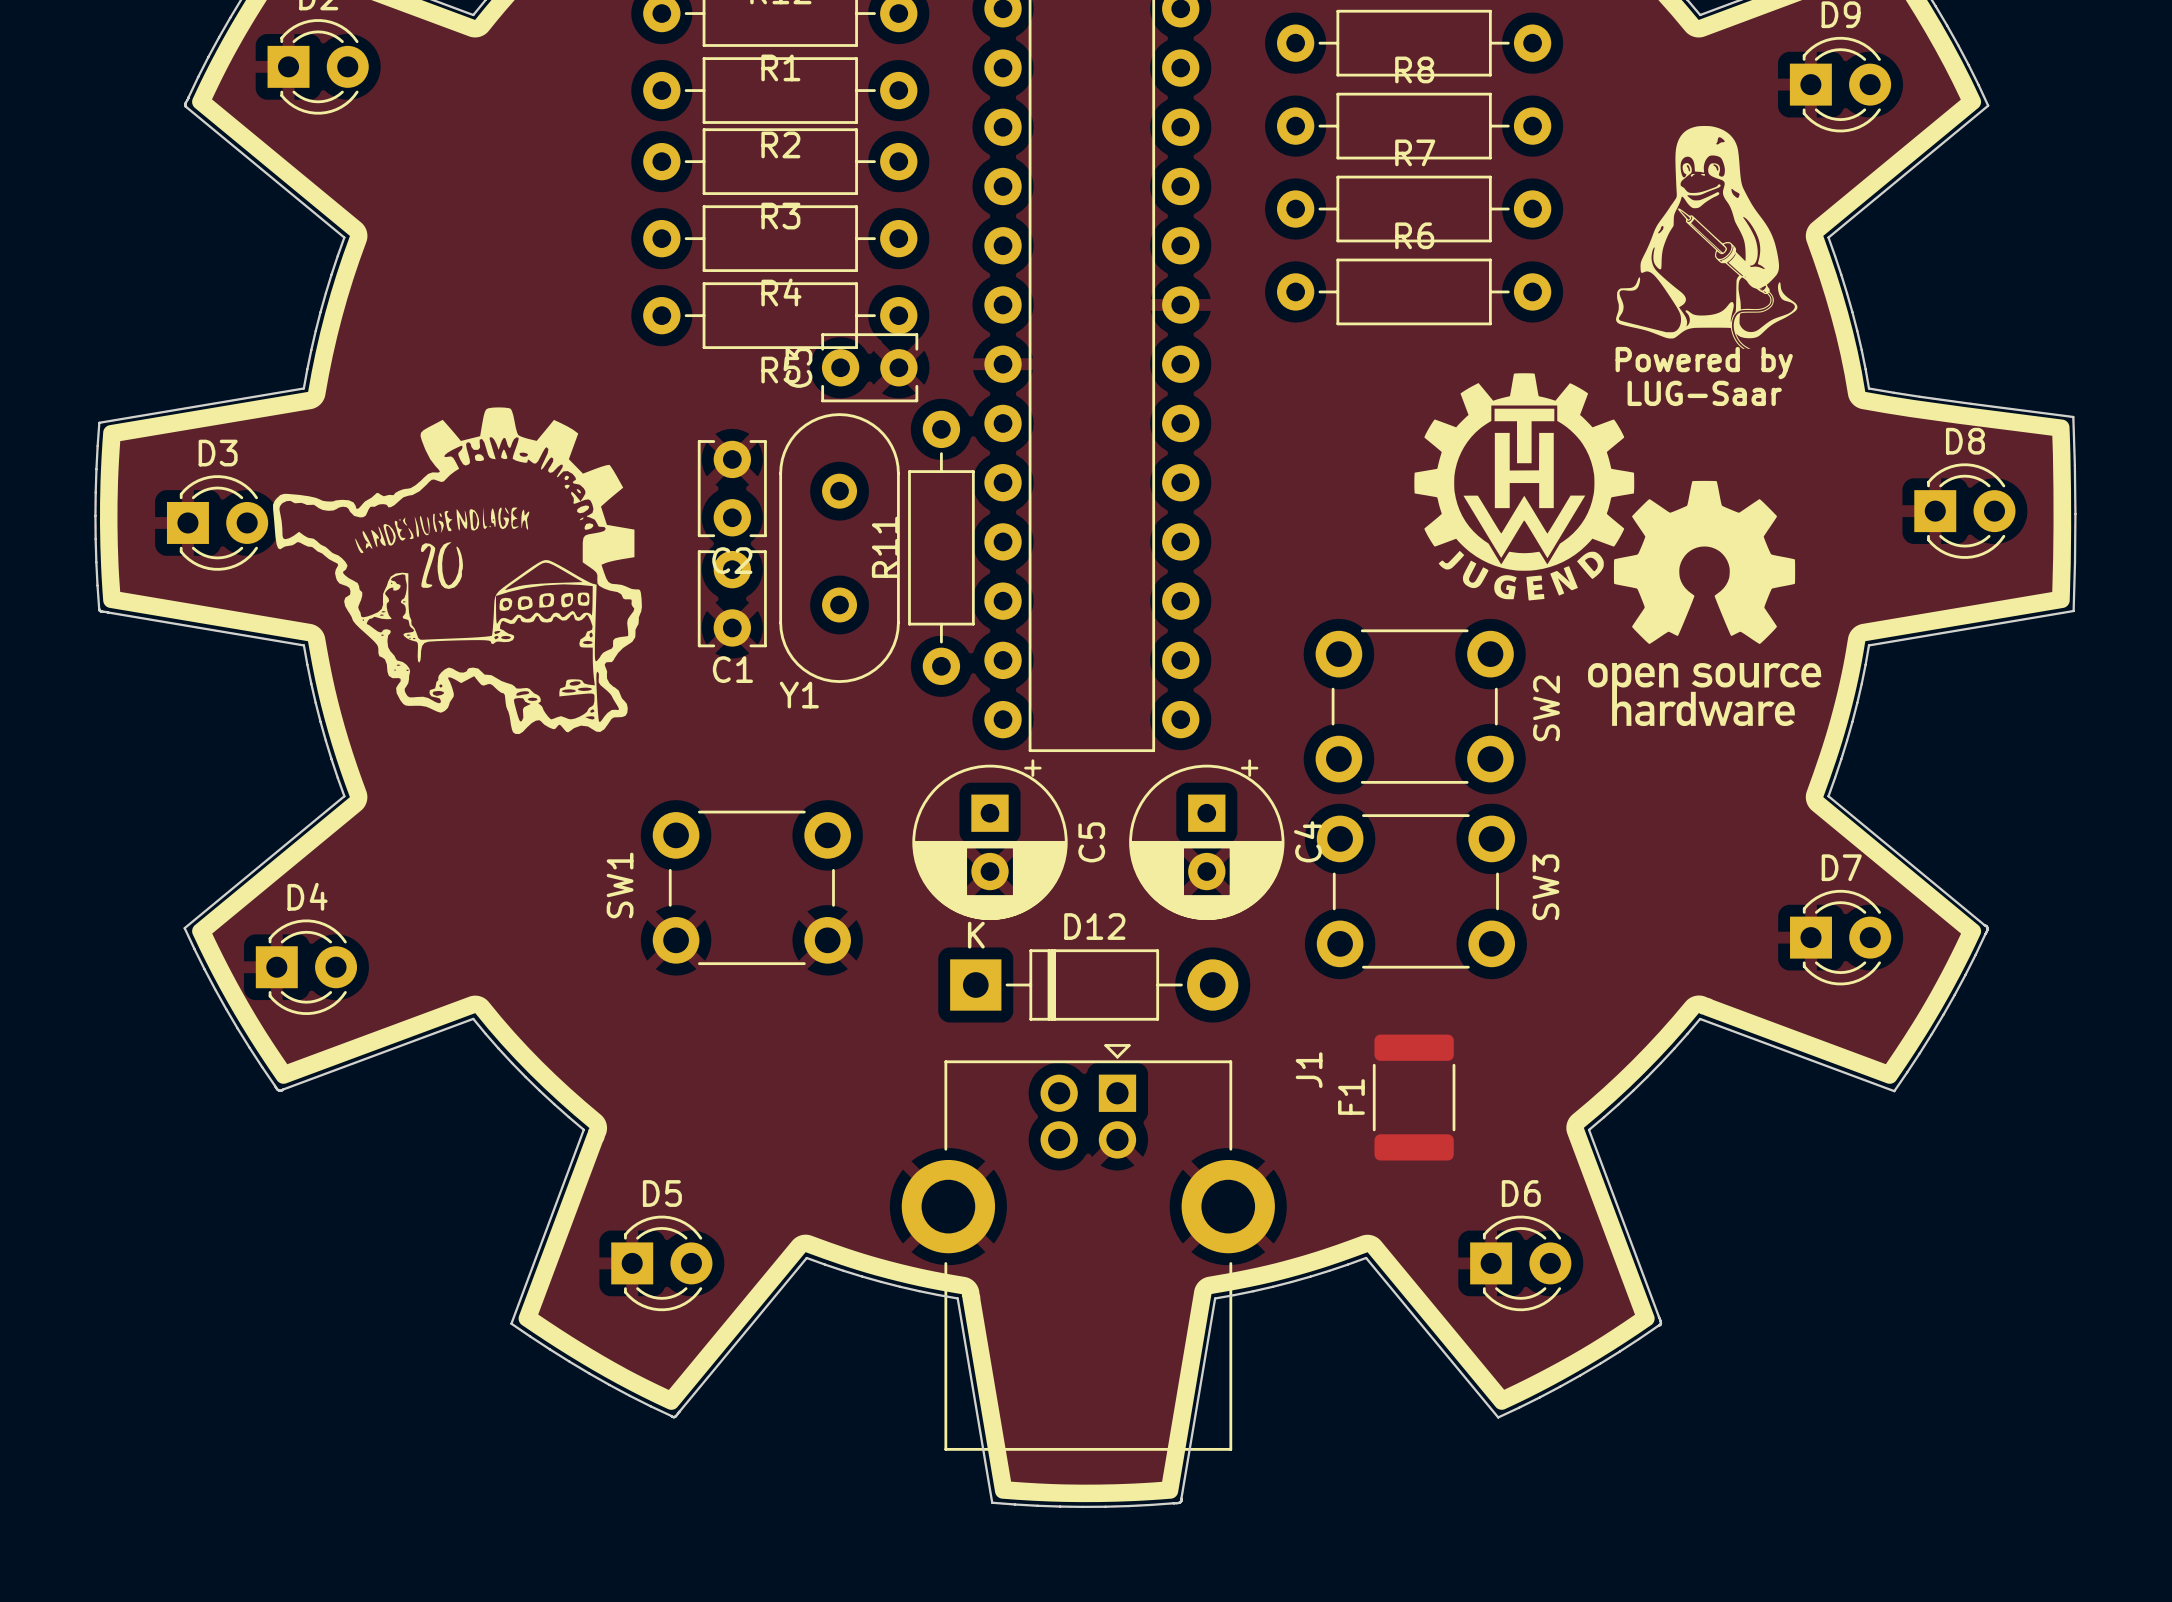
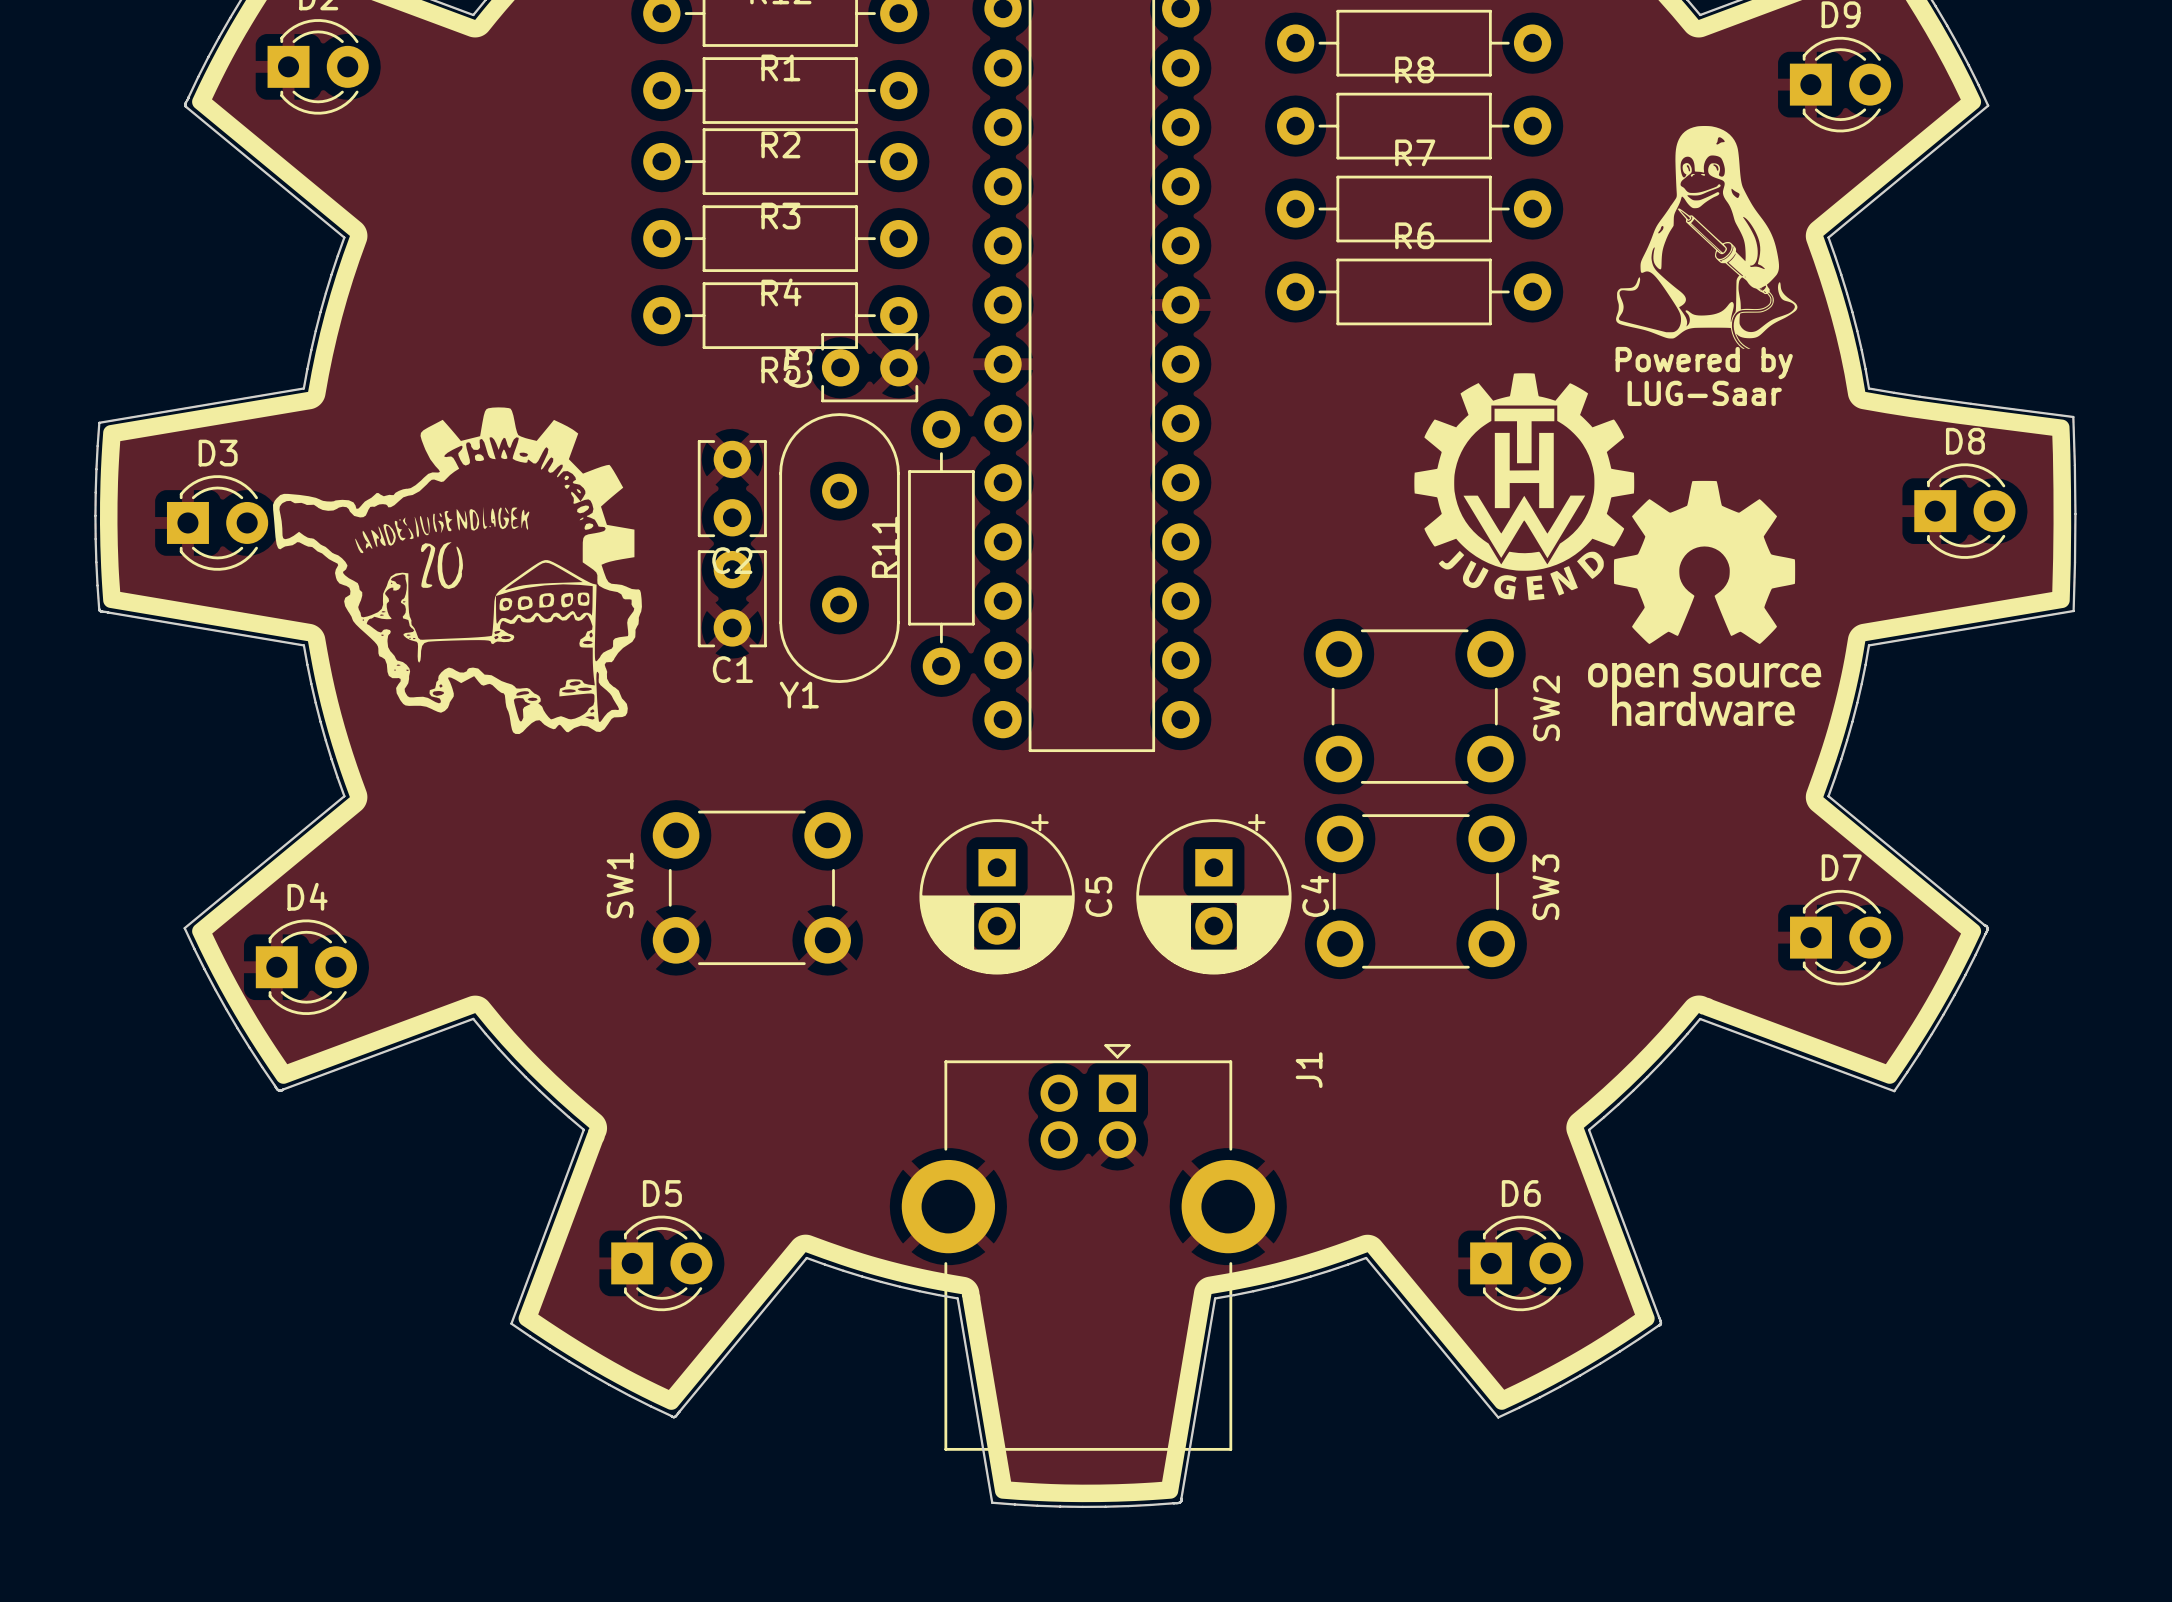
C5 position: (989, 839) -> (997, 894)
C4 position: (1206, 839) -> (1213, 894)
D12: (1094, 985) -> none
F1: (1414, 1097) -> none

